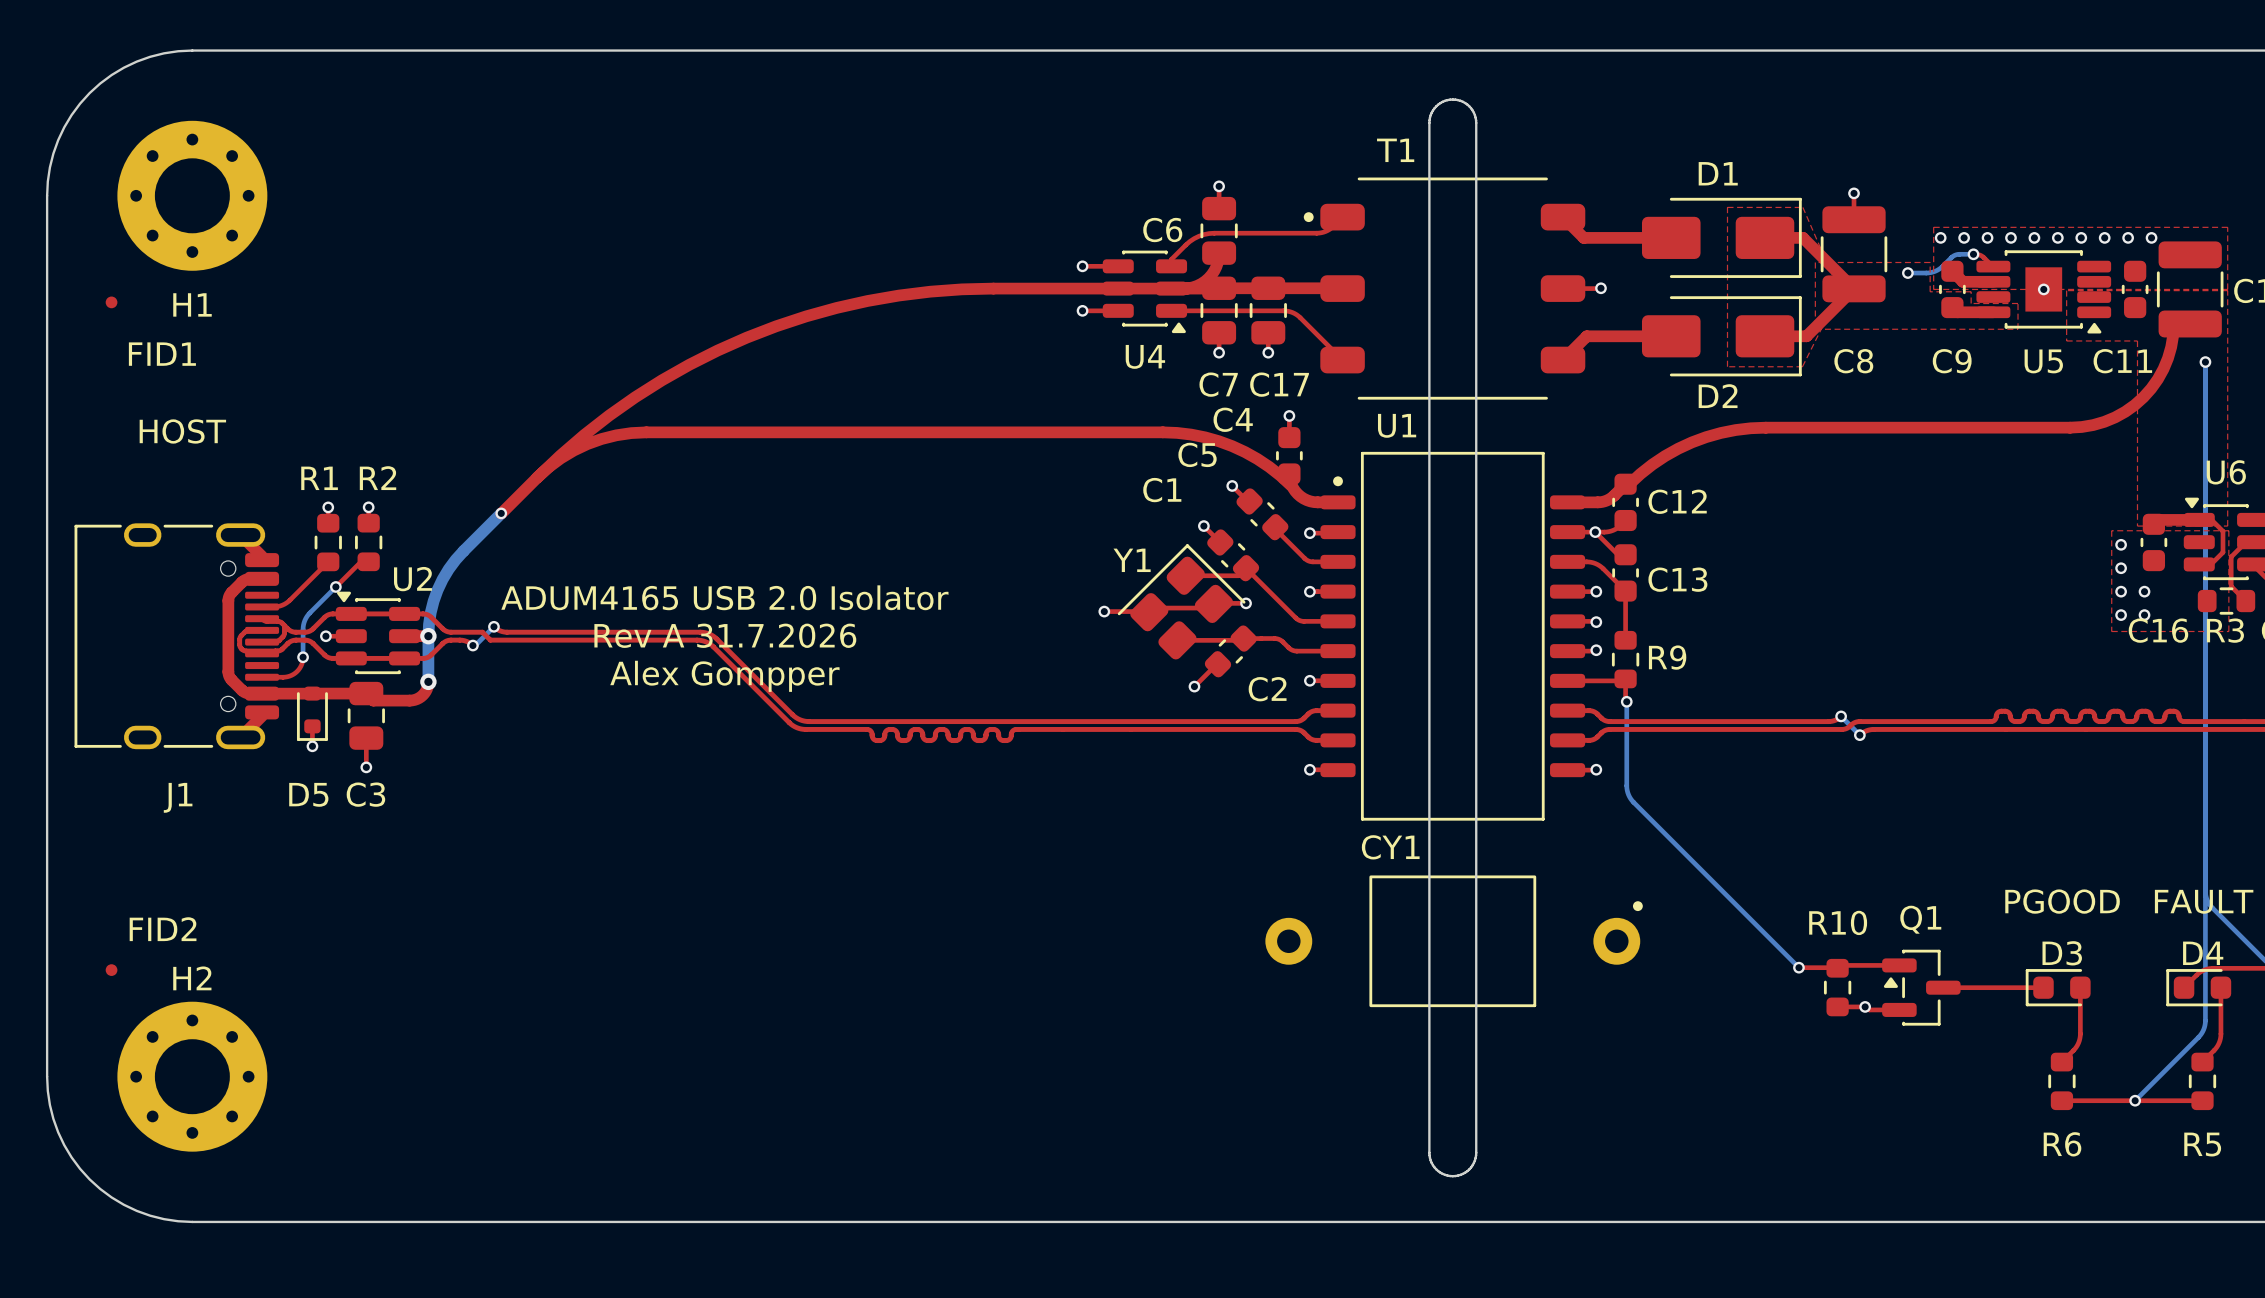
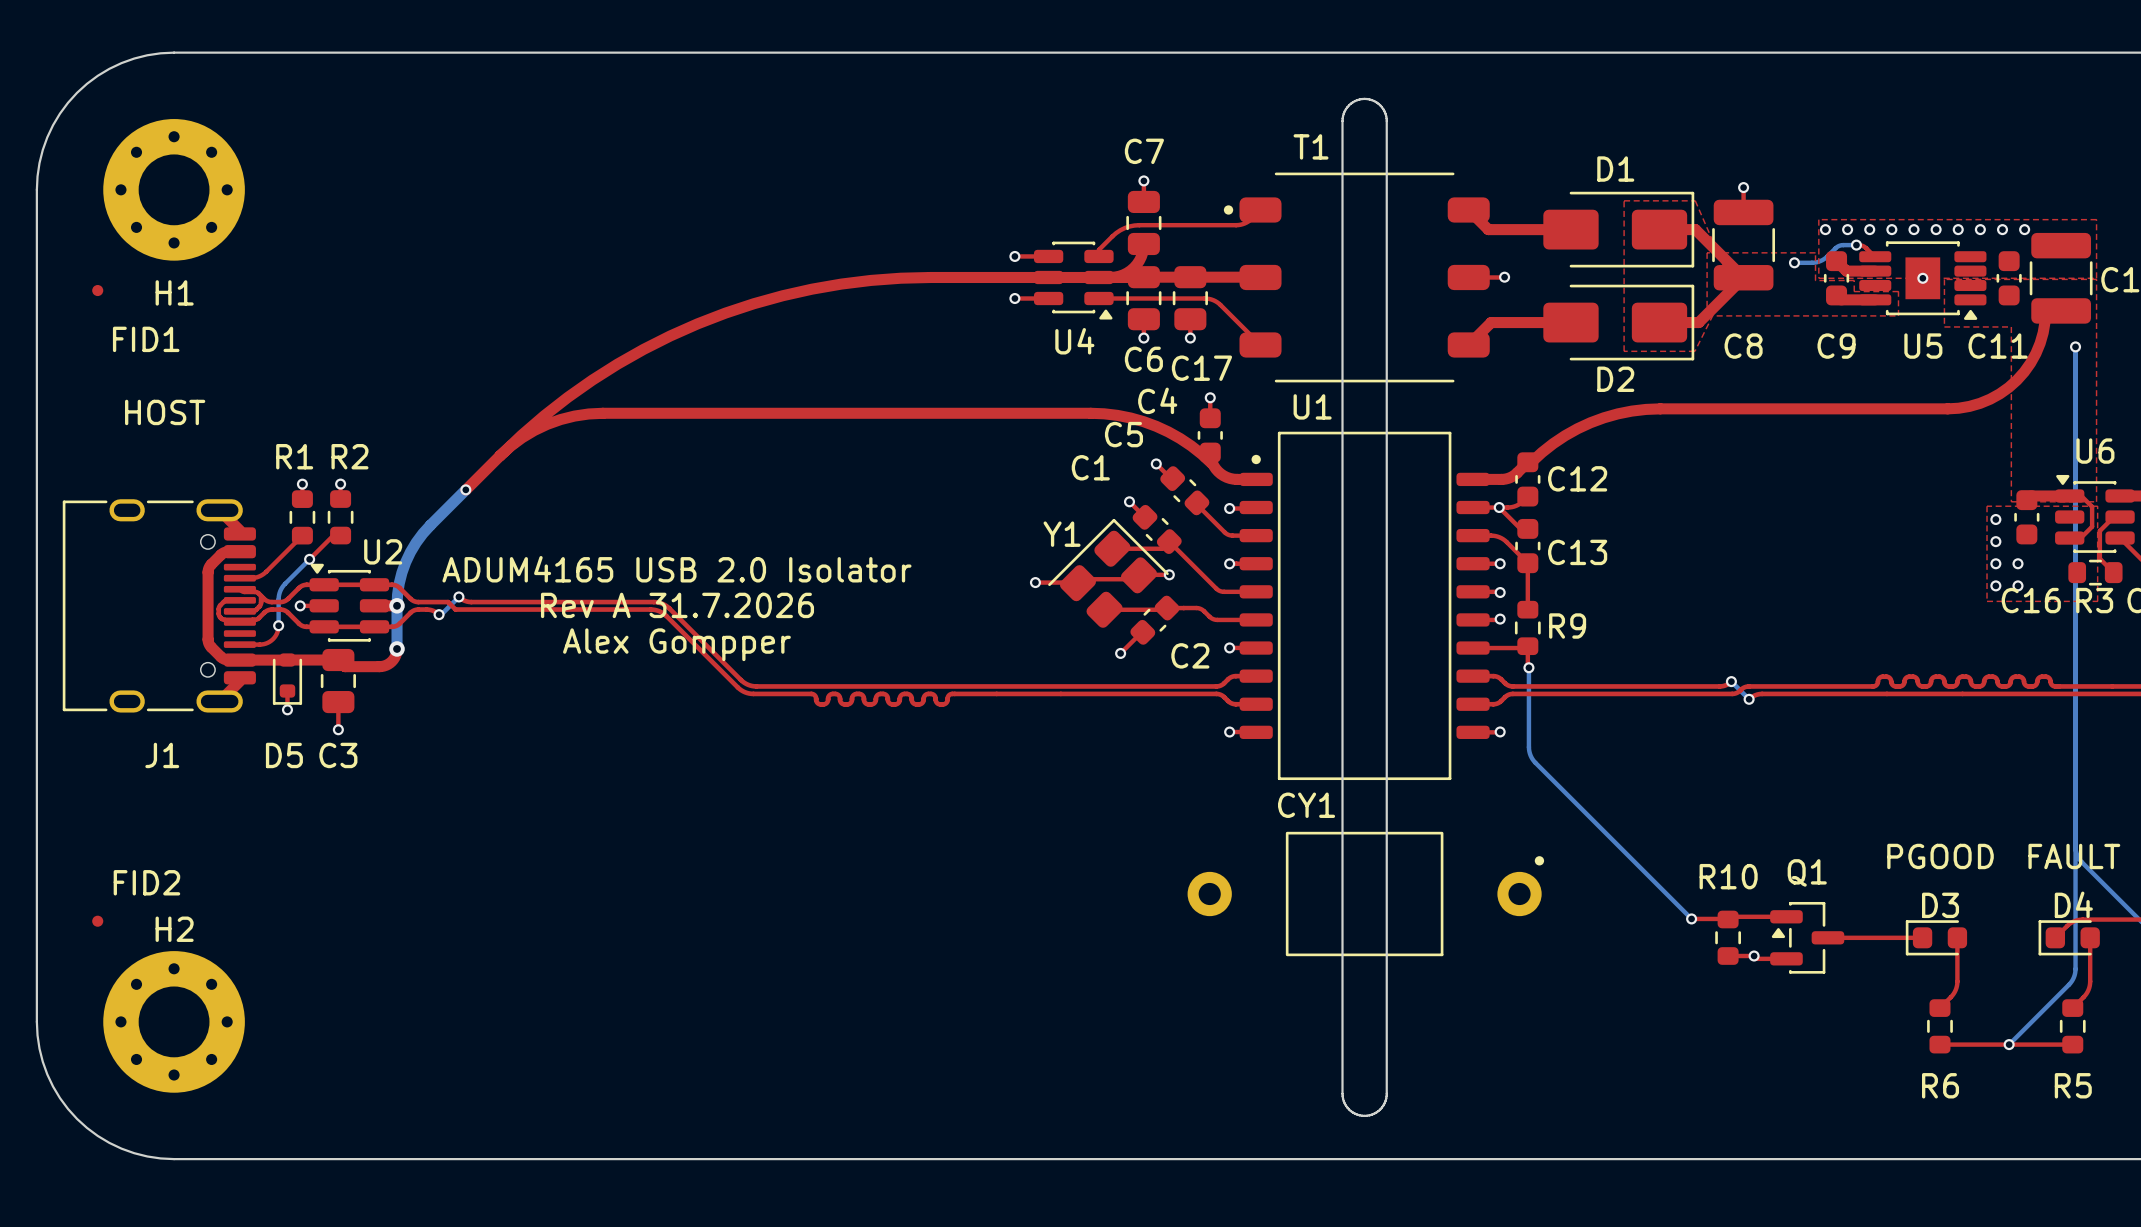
C6 name: C6 (1162, 230) -> C7 (1144, 151)
C7 name: C7 (1218, 384) -> C6 (1143, 359)

